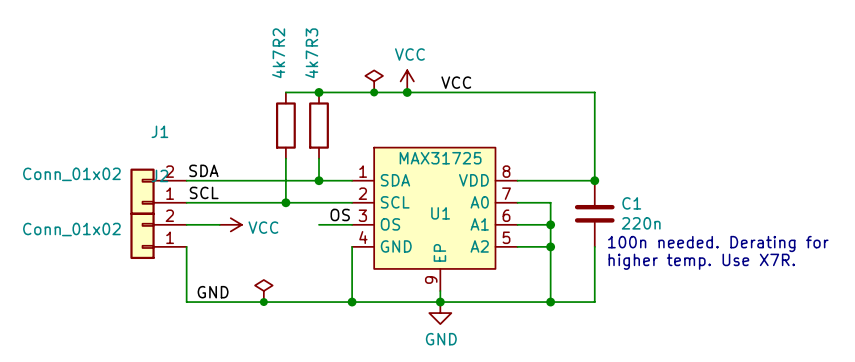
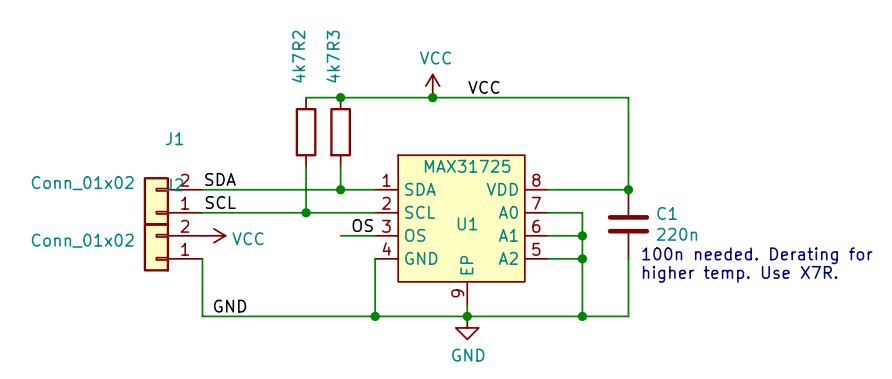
power symbol: (374, 81) -> none
junction: (374, 92) -> none
power symbol position: VCC (230, 224) -> VCC (213, 235)
power symbol: (263, 291) -> none
junction: (263, 302) -> none

